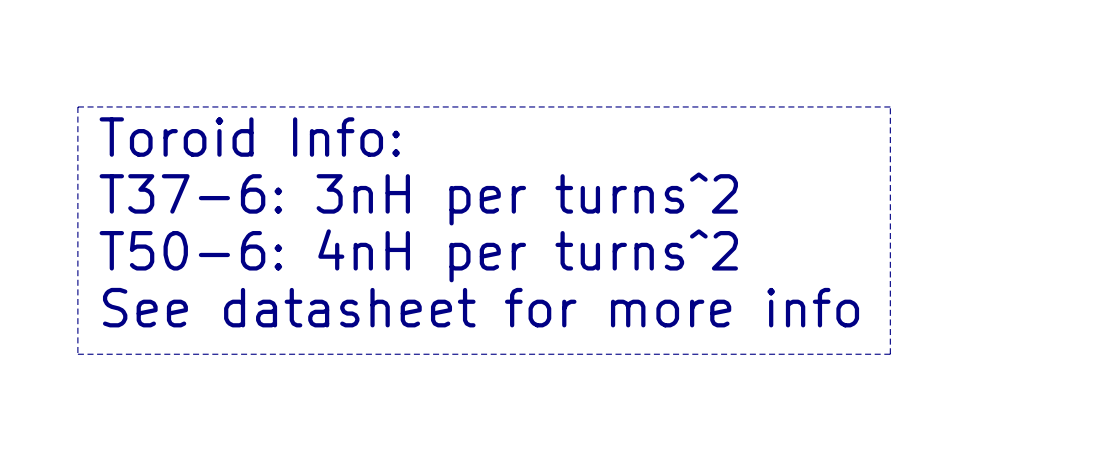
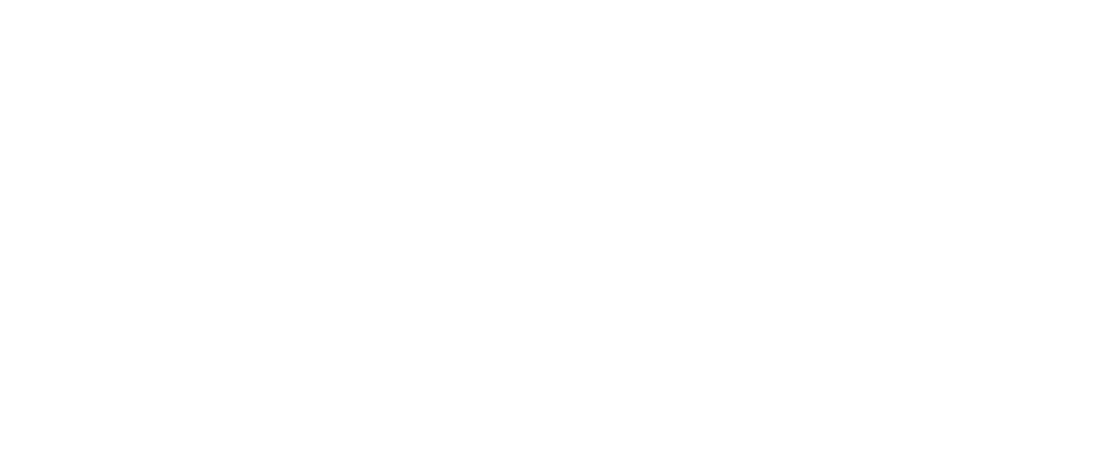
line: (77, 106) (890, 106) (890, 354) (77, 354) (77, 106) -> none
text: Toroid Info: (249, 137) -> none
text: T37-6: 3nH per turns^2 (418, 198) -> none
text: T50-6: 4nH per turns^2 (418, 255) -> none
text: See datasheet for more info (481, 307) -> none

